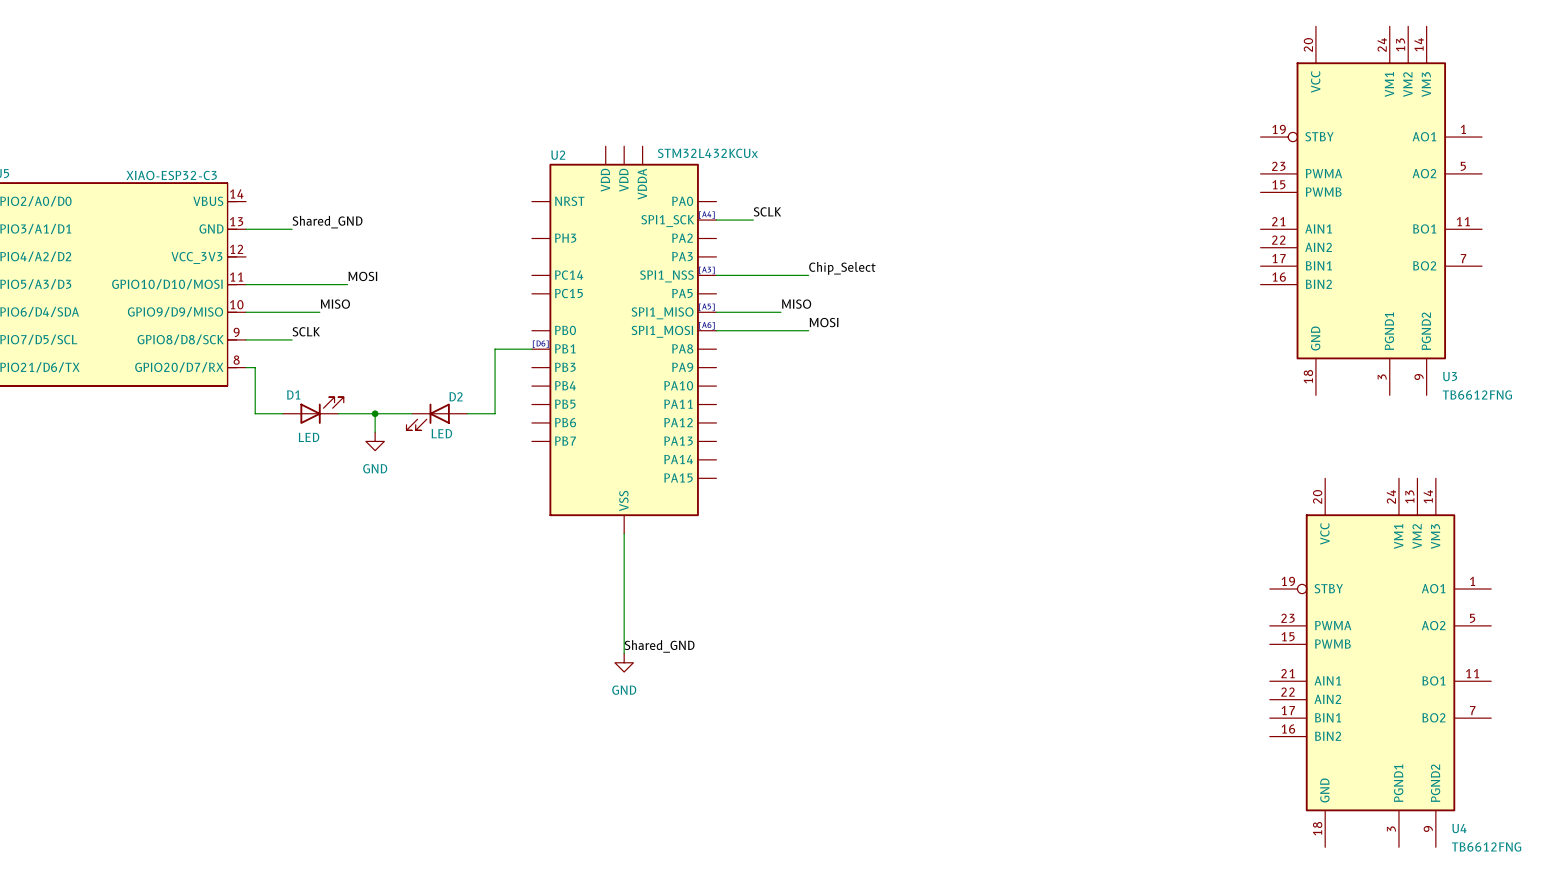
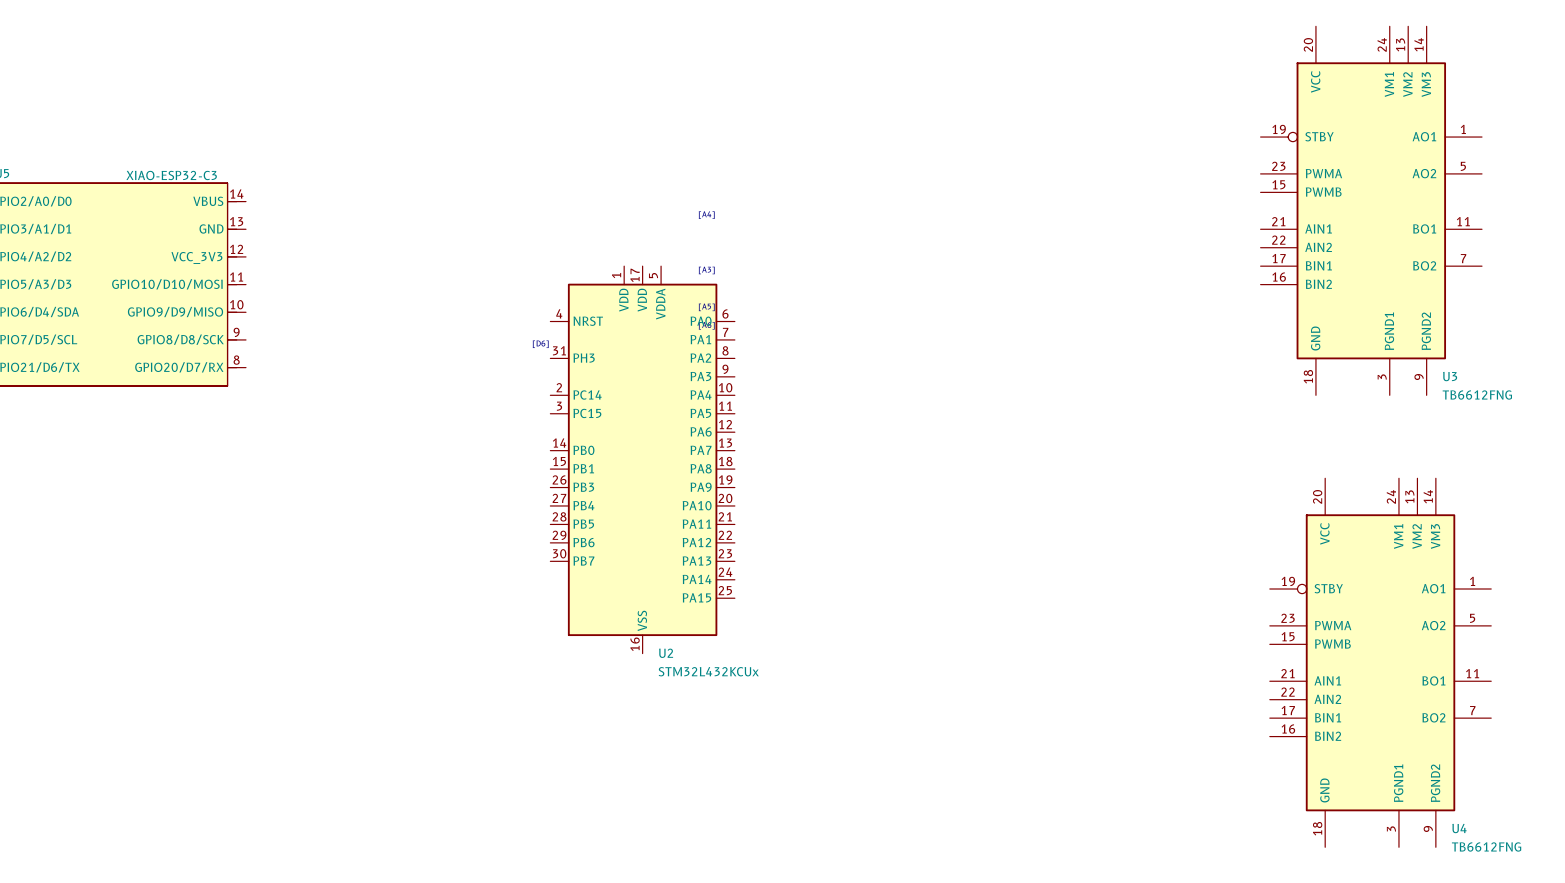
U2 symbol: [531, 146, 717, 534] -> [550, 266, 735, 654]
U2 value position: STM32L432KCUx (707, 153) -> STM32L432KCUx (708, 671)
U2 name position: U2 (558, 155) -> U2 (666, 653)
label: SCLK (767, 211) -> none
wire: (716, 220) (753, 220) -> none
label: Shared_GND (327, 222) -> none
wire: (245, 229) (292, 229) -> none
label: Chip_Select (842, 268) -> none
wire: (716, 275) (808, 275) -> none
label: MOSI (362, 276) -> none
wire: (245, 284) (347, 284) -> none
label: MISO (335, 304) -> none
label: MISO (796, 304) -> none
wire: (245, 312) (319, 312) -> none
wire: (716, 312) (780, 312) -> none
label: MOSI (824, 322) -> none
wire: (716, 330) (808, 330) -> none
label: SCLK (306, 331) -> none
wire: (245, 339) (292, 339) -> none
wire: (531, 349) (495, 349) (495, 413) (467, 413) -> none
wire: (245, 367) (255, 367) (255, 413) (282, 413) -> none
D1: LED (313, 410) -> none
wire: (338, 413) (412, 413) -> none
wire: (375, 413) (375, 432) -> none
junction: (375, 413) -> none
D2: LED (436, 416) -> none
power symbol: GND (375, 441) -> none
label: Shared_GND (659, 646) -> none
power symbol: GND (624, 662) -> none

